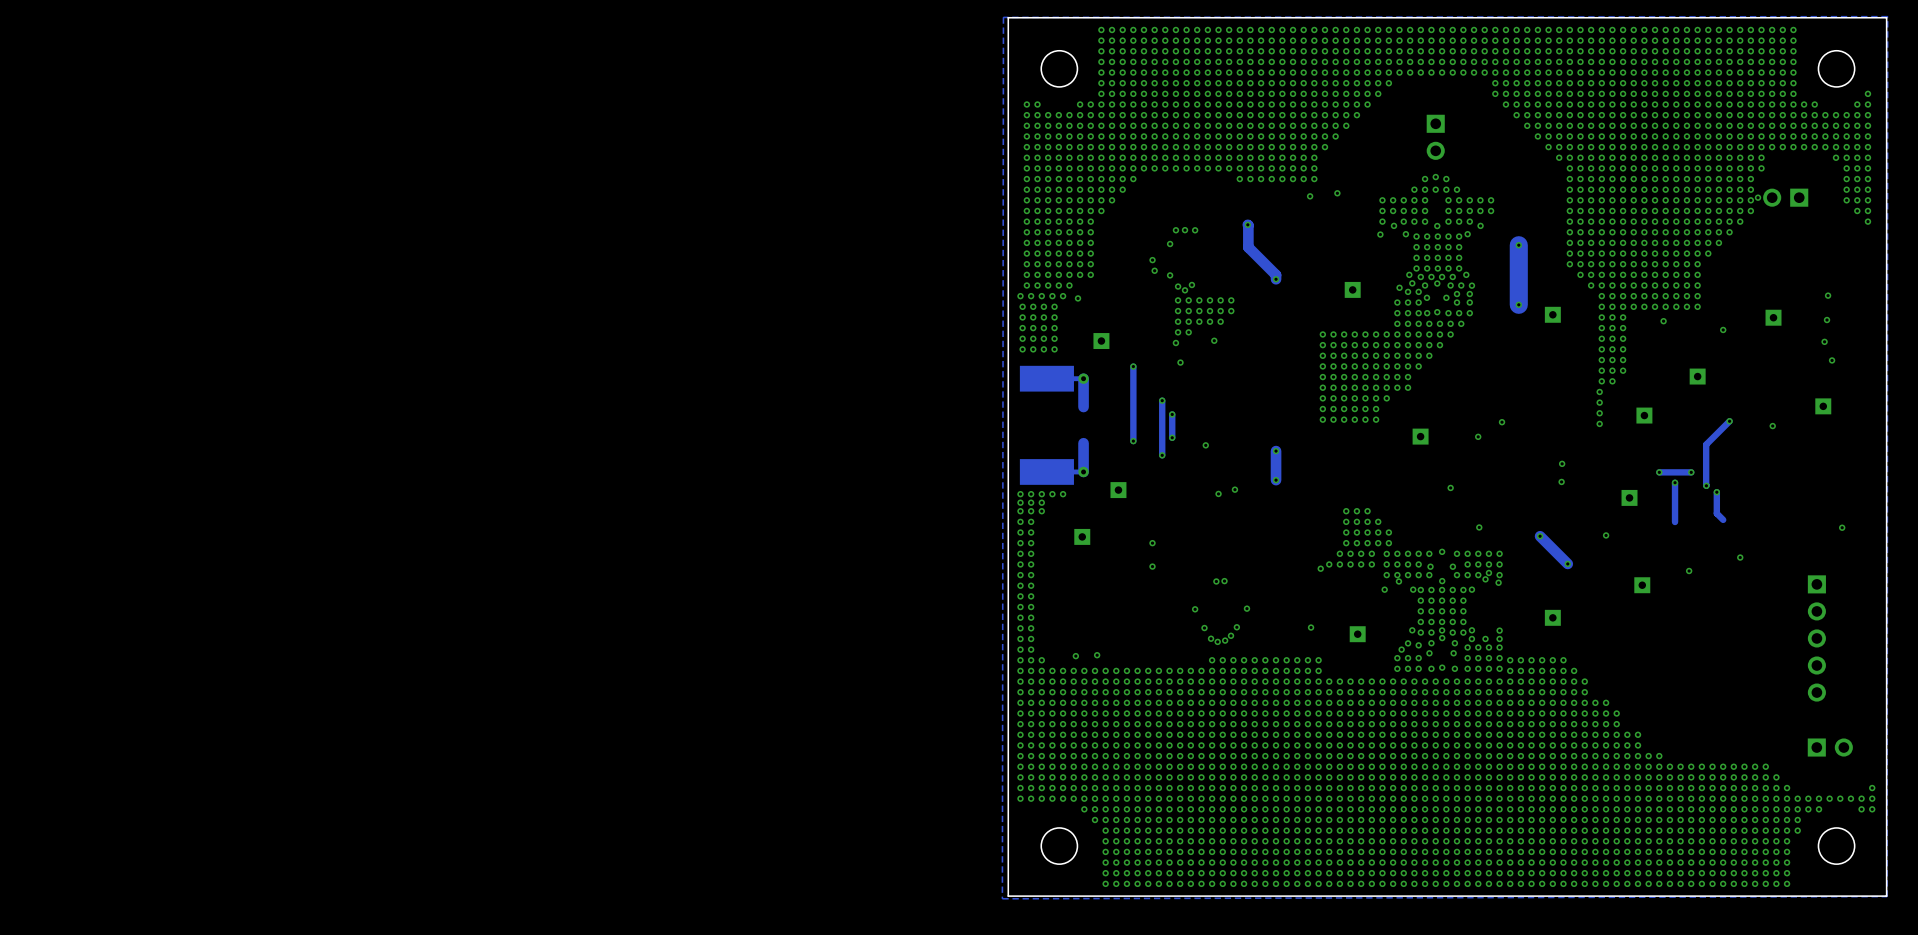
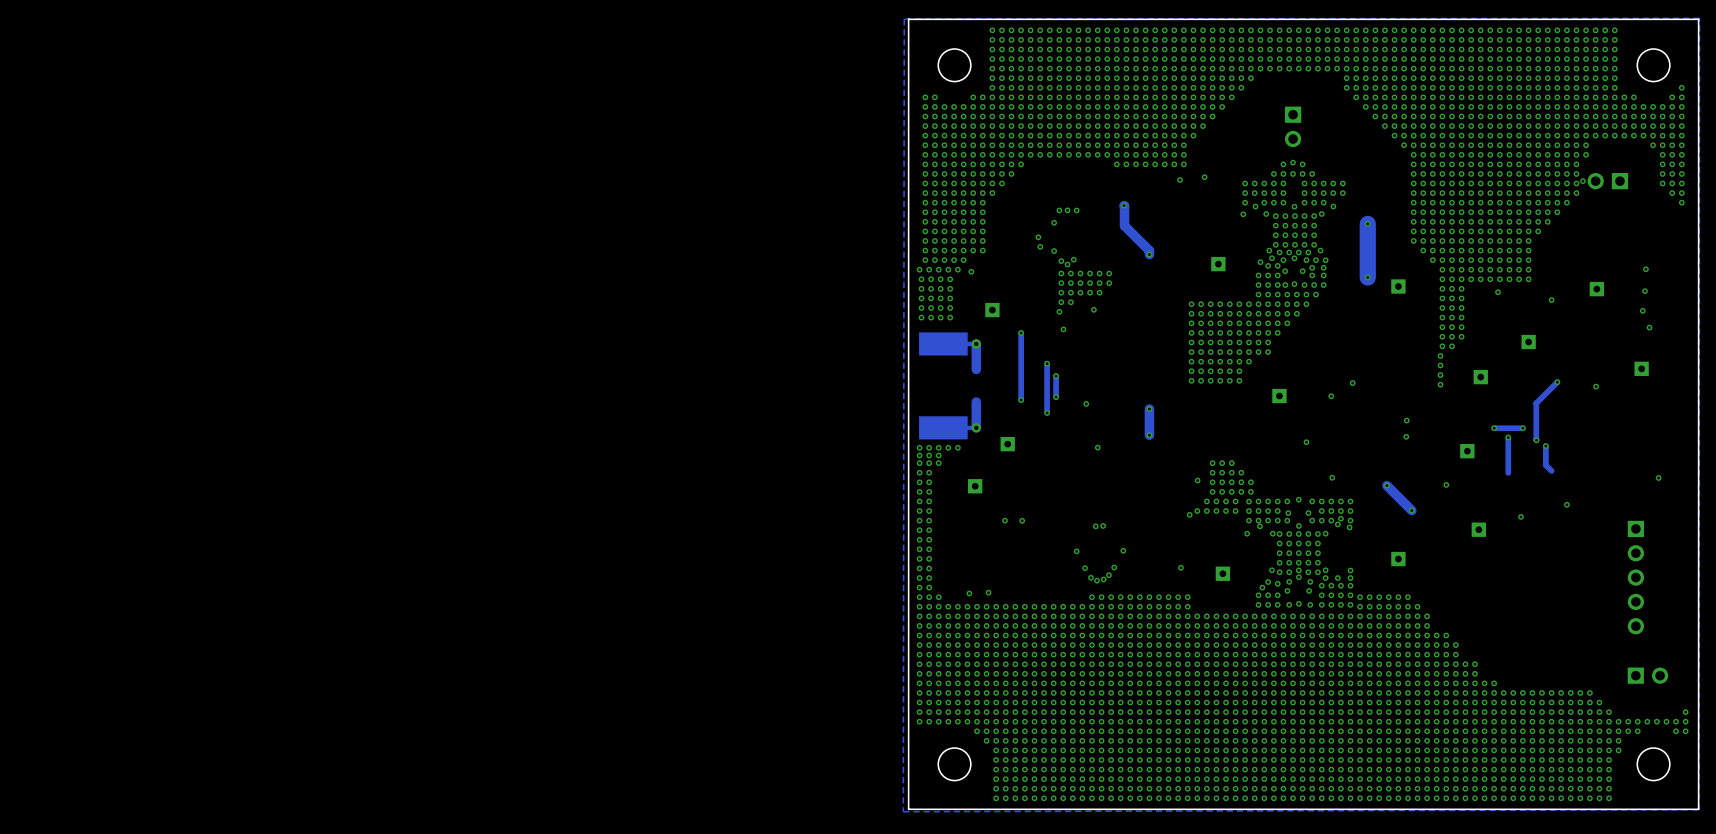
via: (1234, 489) -> none
via: none -> (1197, 480)
via: (1152, 543) -> none
via: (1152, 566) -> none
via: none -> (1004, 520)
via: none -> (1022, 520)

